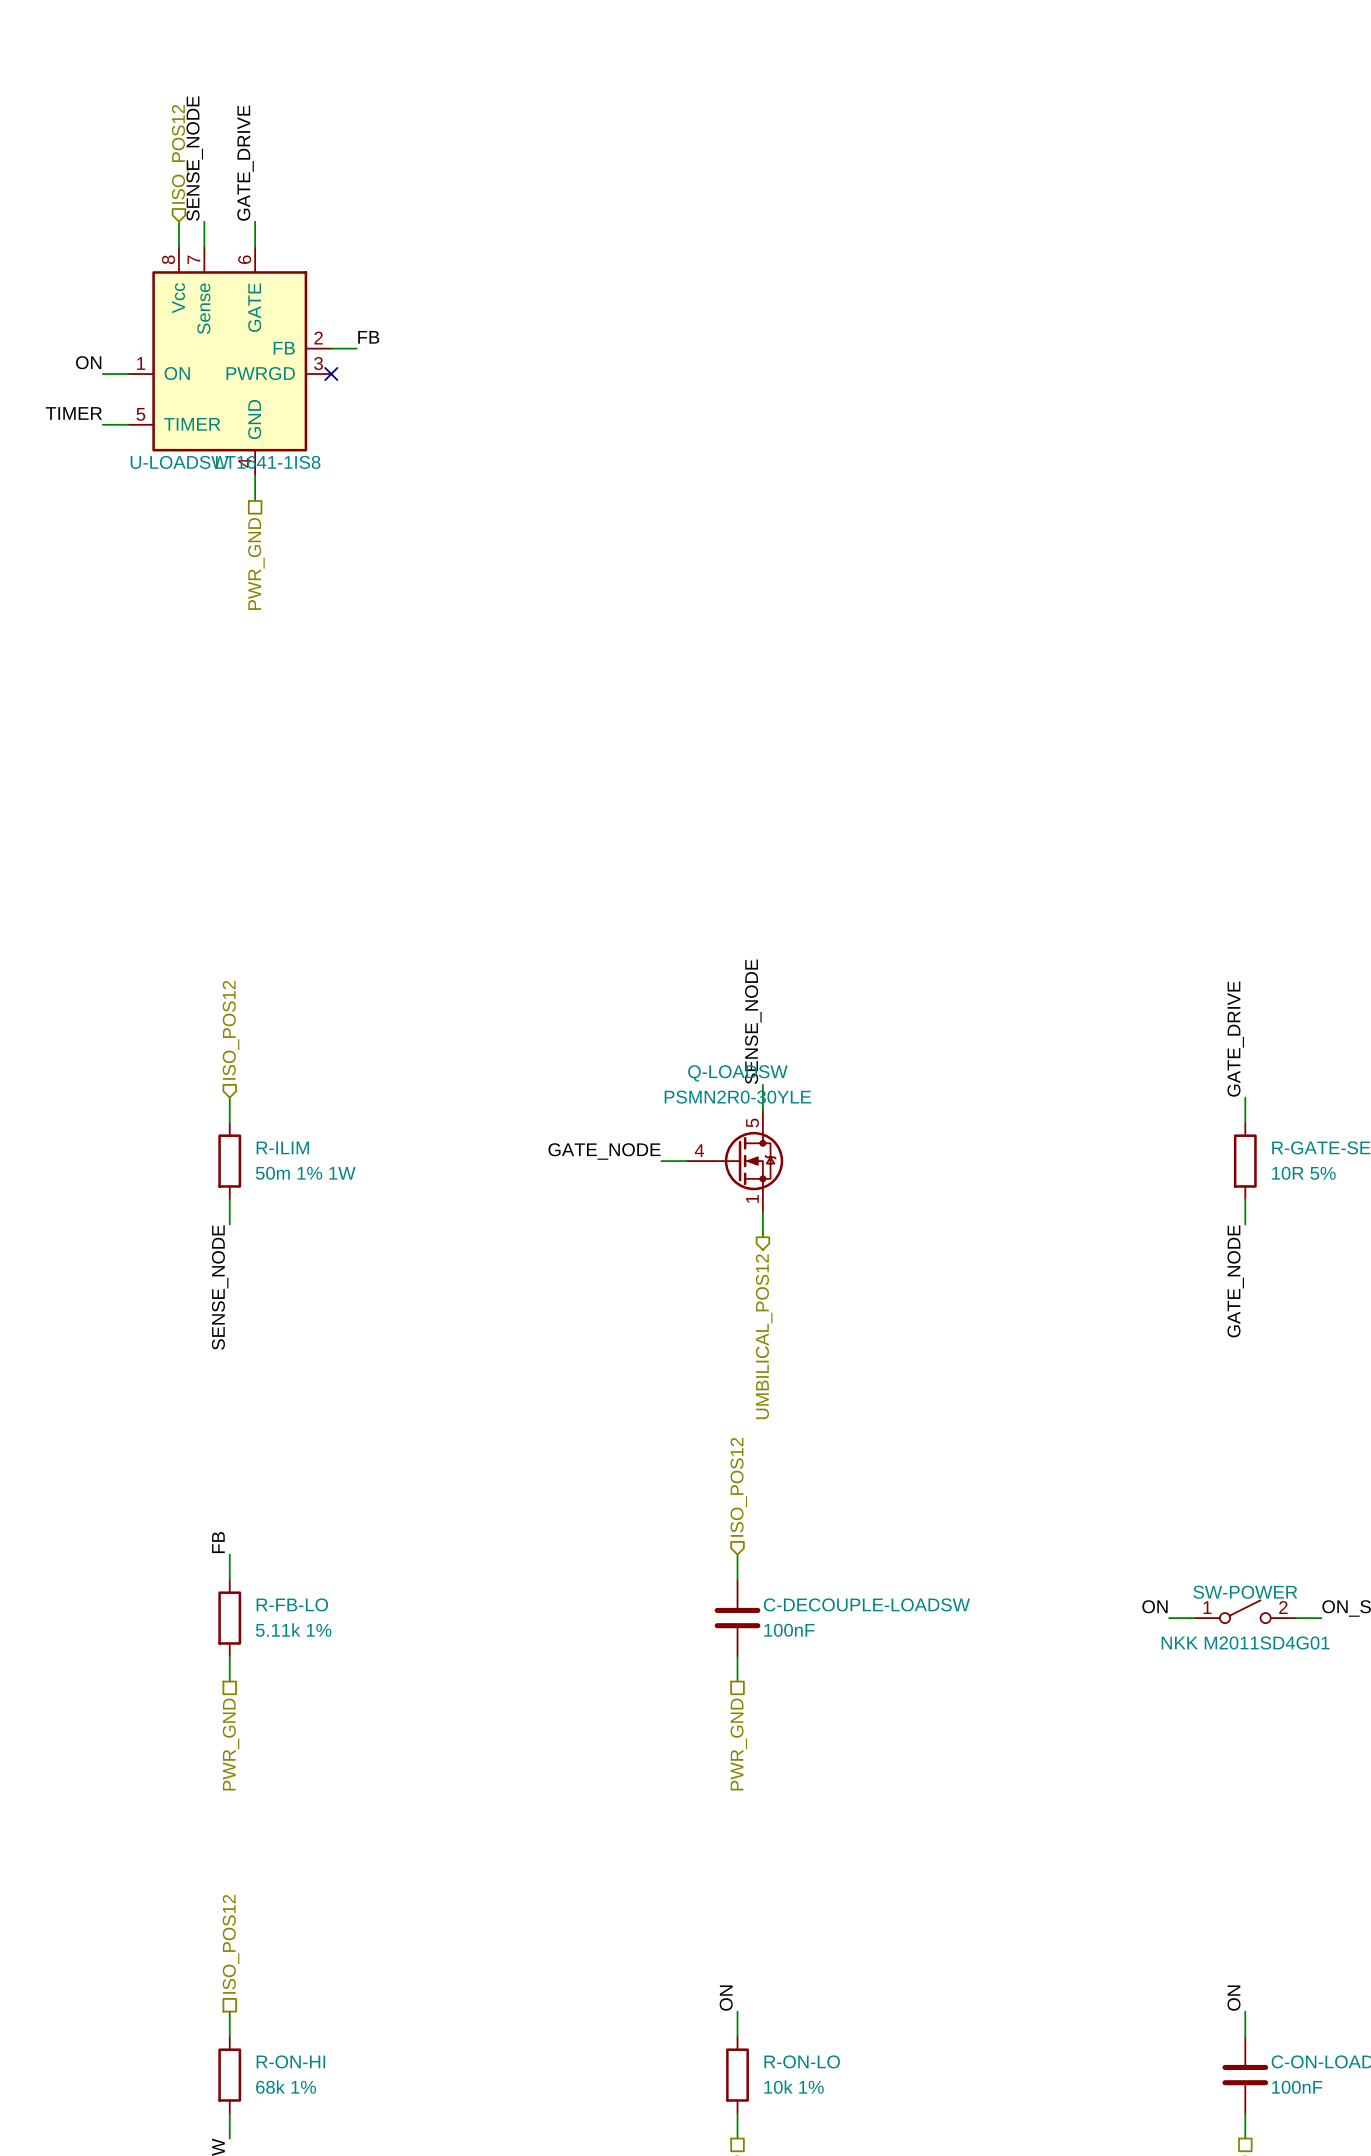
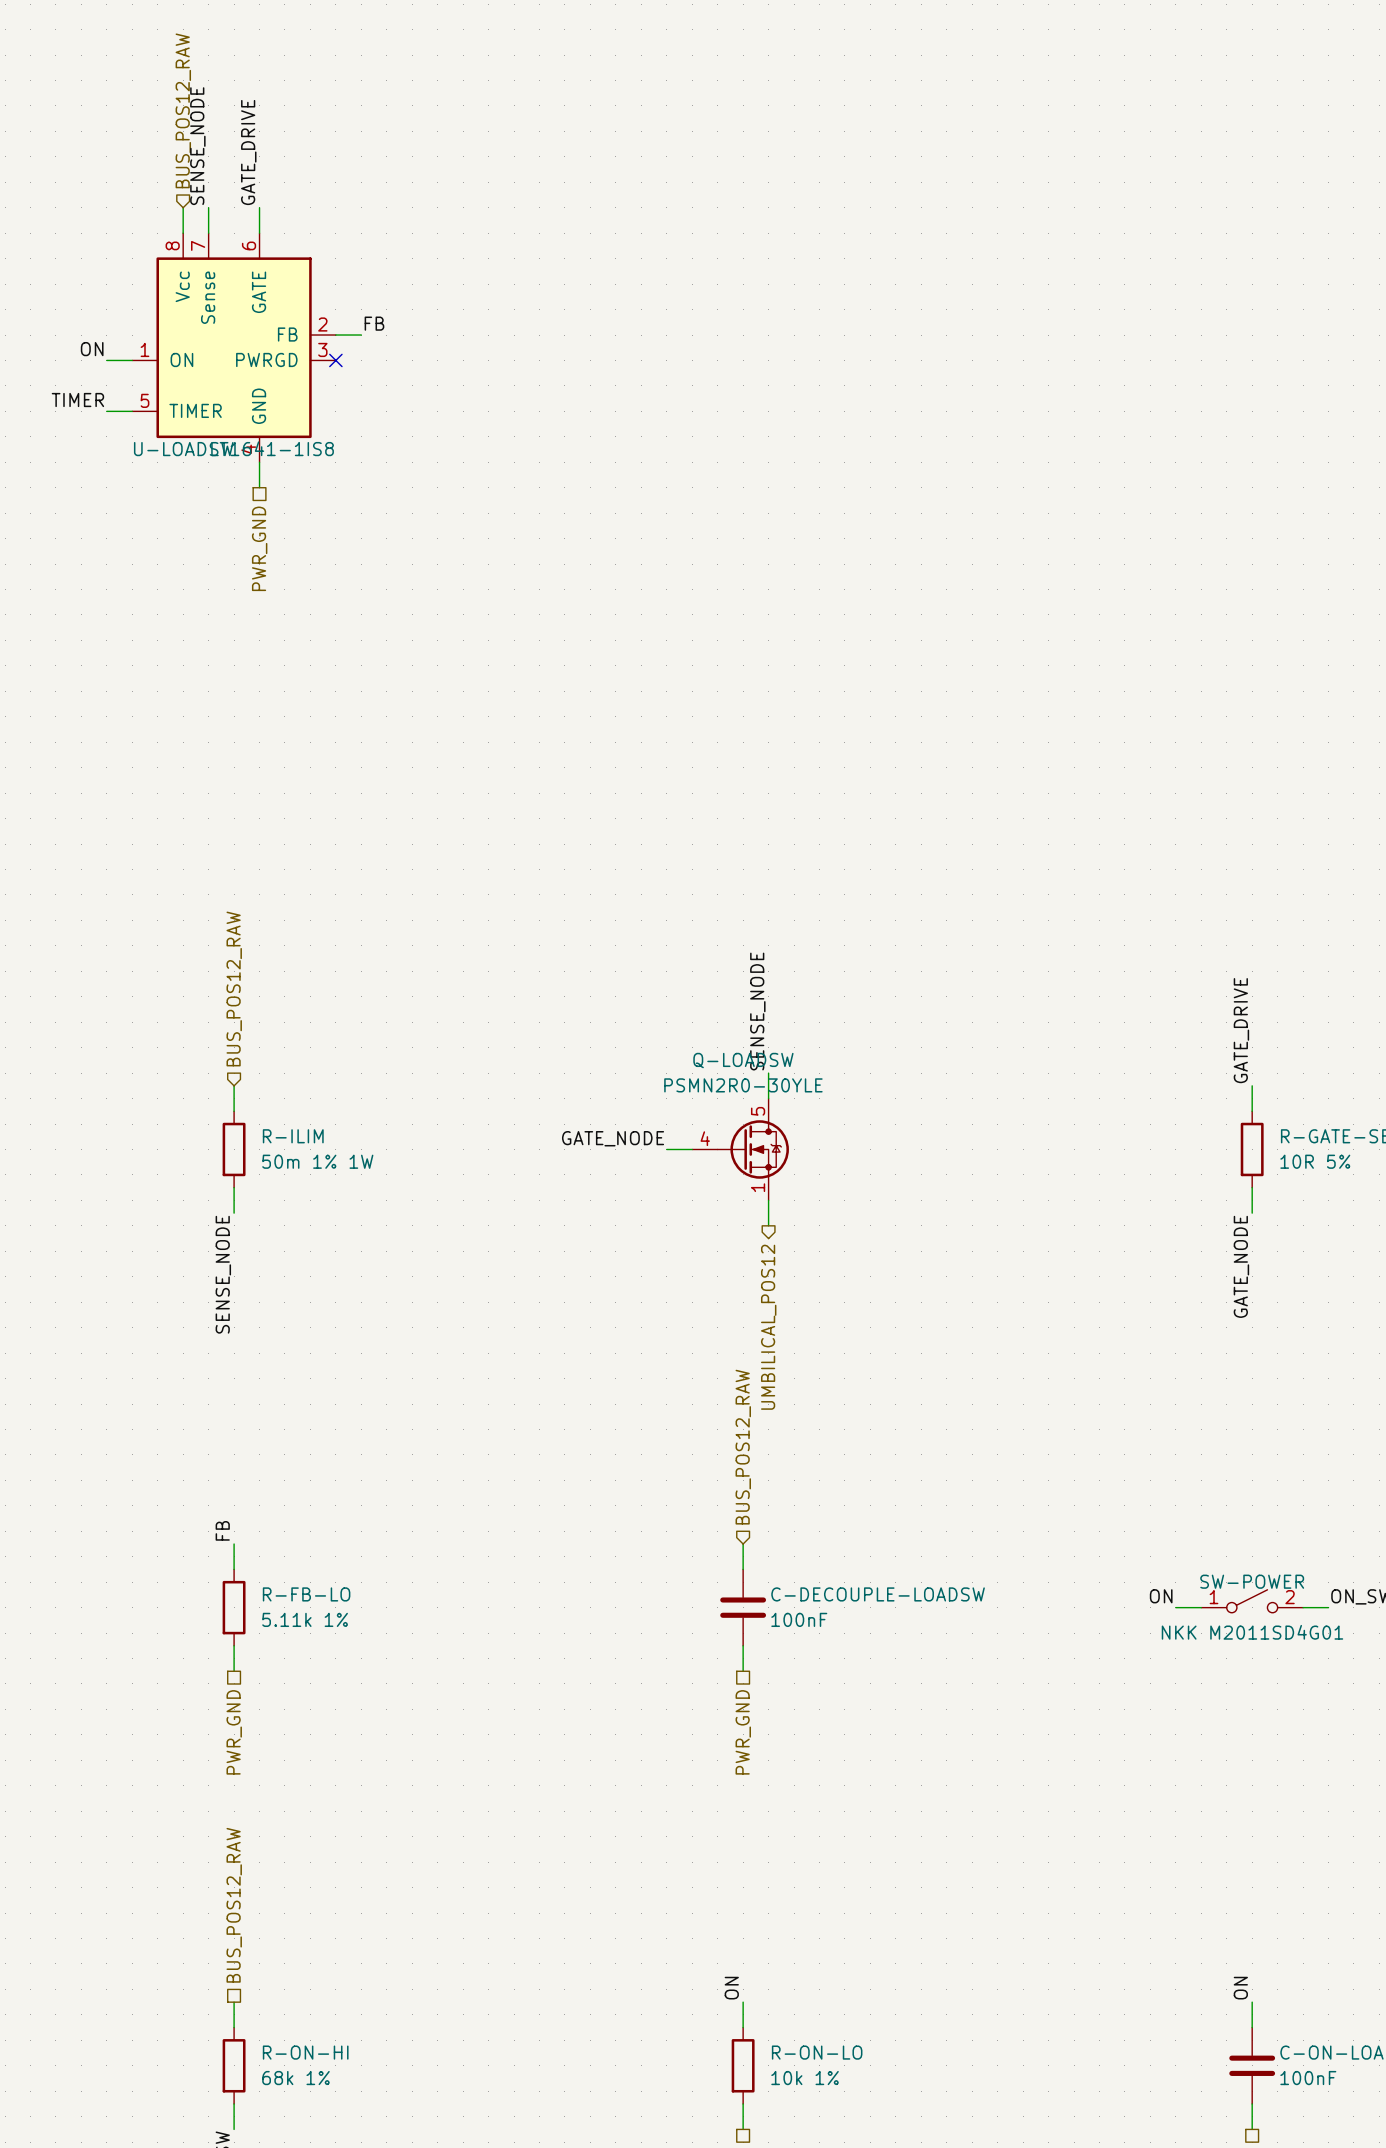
hierarchical label: ISO_POS12 (180, 154) -> BUS_POS12_RAW (183, 110)
hierarchical label: ISO_POS12 (231, 1030) -> BUS_POS12_RAW (234, 989)
hierarchical label: ISO_POS12 (738, 1487) -> BUS_POS12_RAW (743, 1447)
hierarchical label: ISO_POS12 (231, 1944) -> BUS_POS12_RAW (234, 1905)

